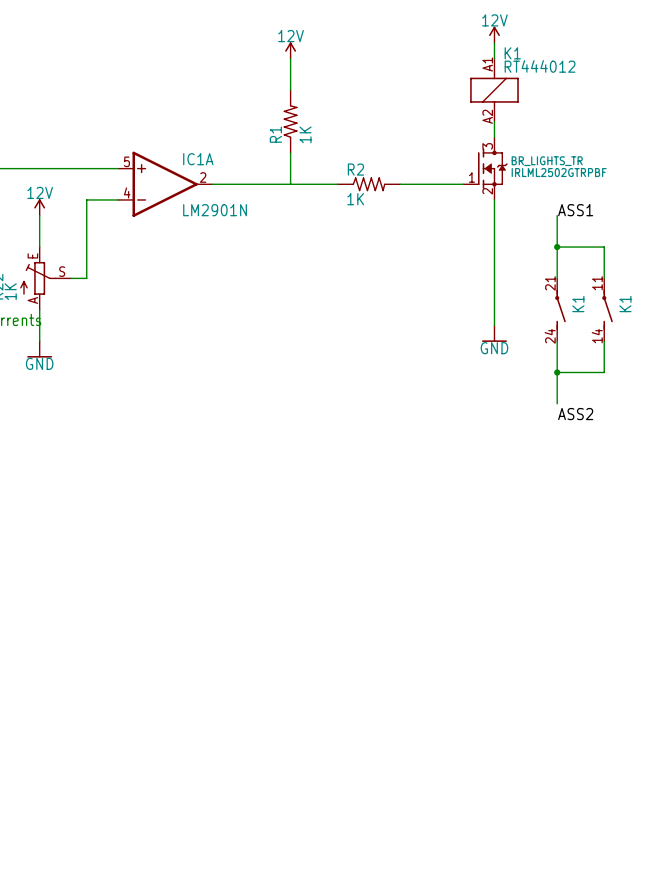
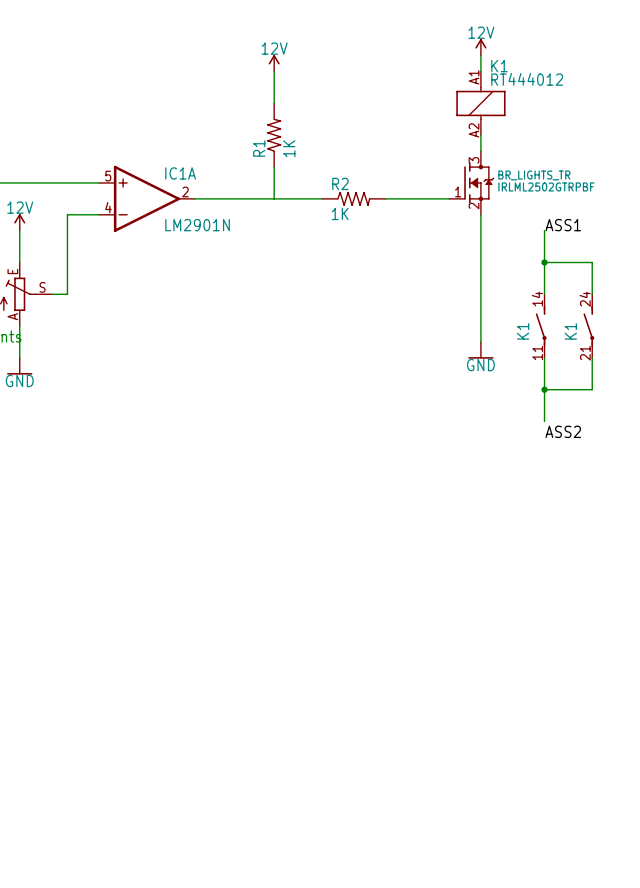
K1 rotation: 0° (560, 309) -> 180° (588, 326)
K1 position: (560, 309) -> (588, 326)
K1 rotation: 0° (607, 309) -> 180° (541, 326)
K1 position: (607, 309) -> (541, 326)

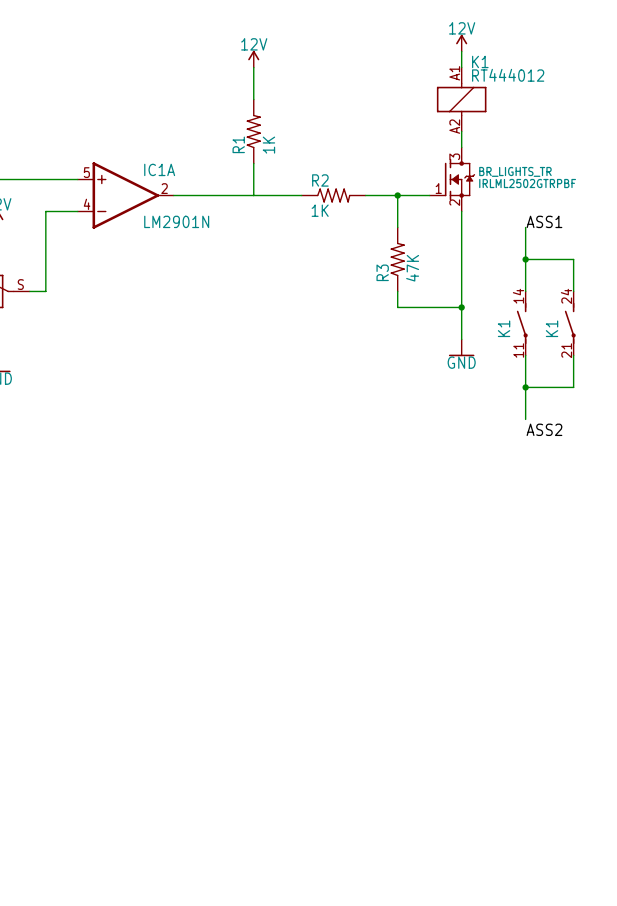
wire: none -> (397, 195) (397, 227)
junction: none -> (397, 195)
R3: none -> 47K (397, 259)
wire: none -> (397, 291) (397, 307) (461, 307)
junction: none -> (461, 307)

